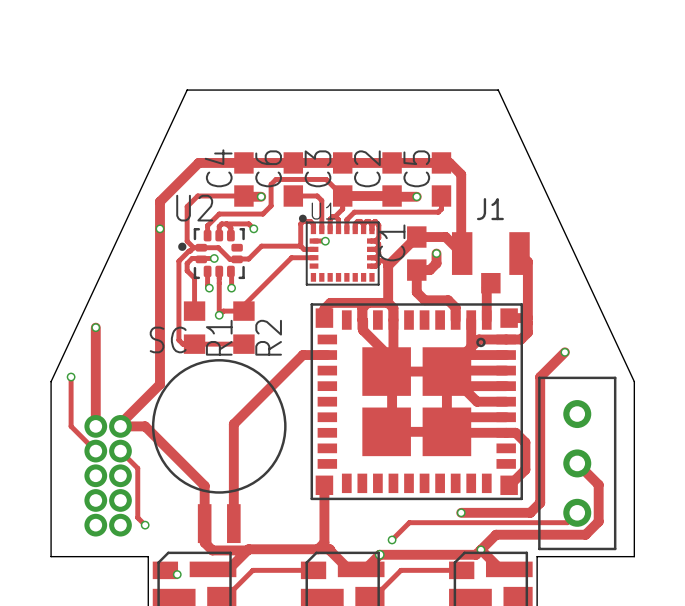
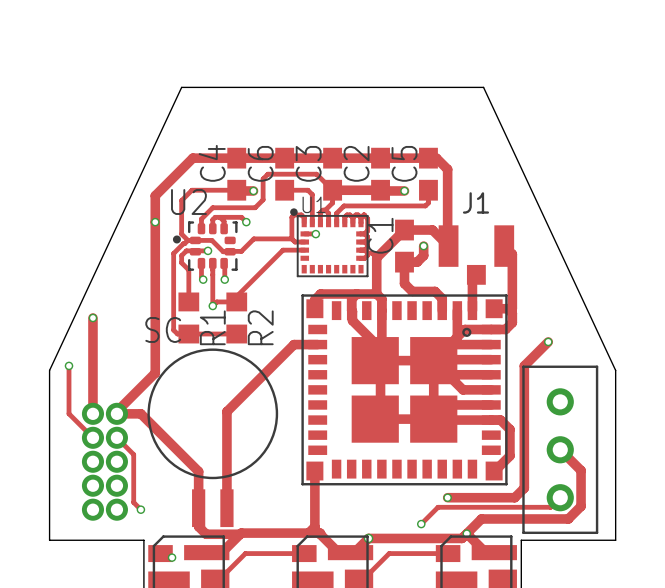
track: (451, 522) (409, 522) (392, 539) -> (438, 507) (421, 524)
via position: (392, 539) -> (421, 524)

